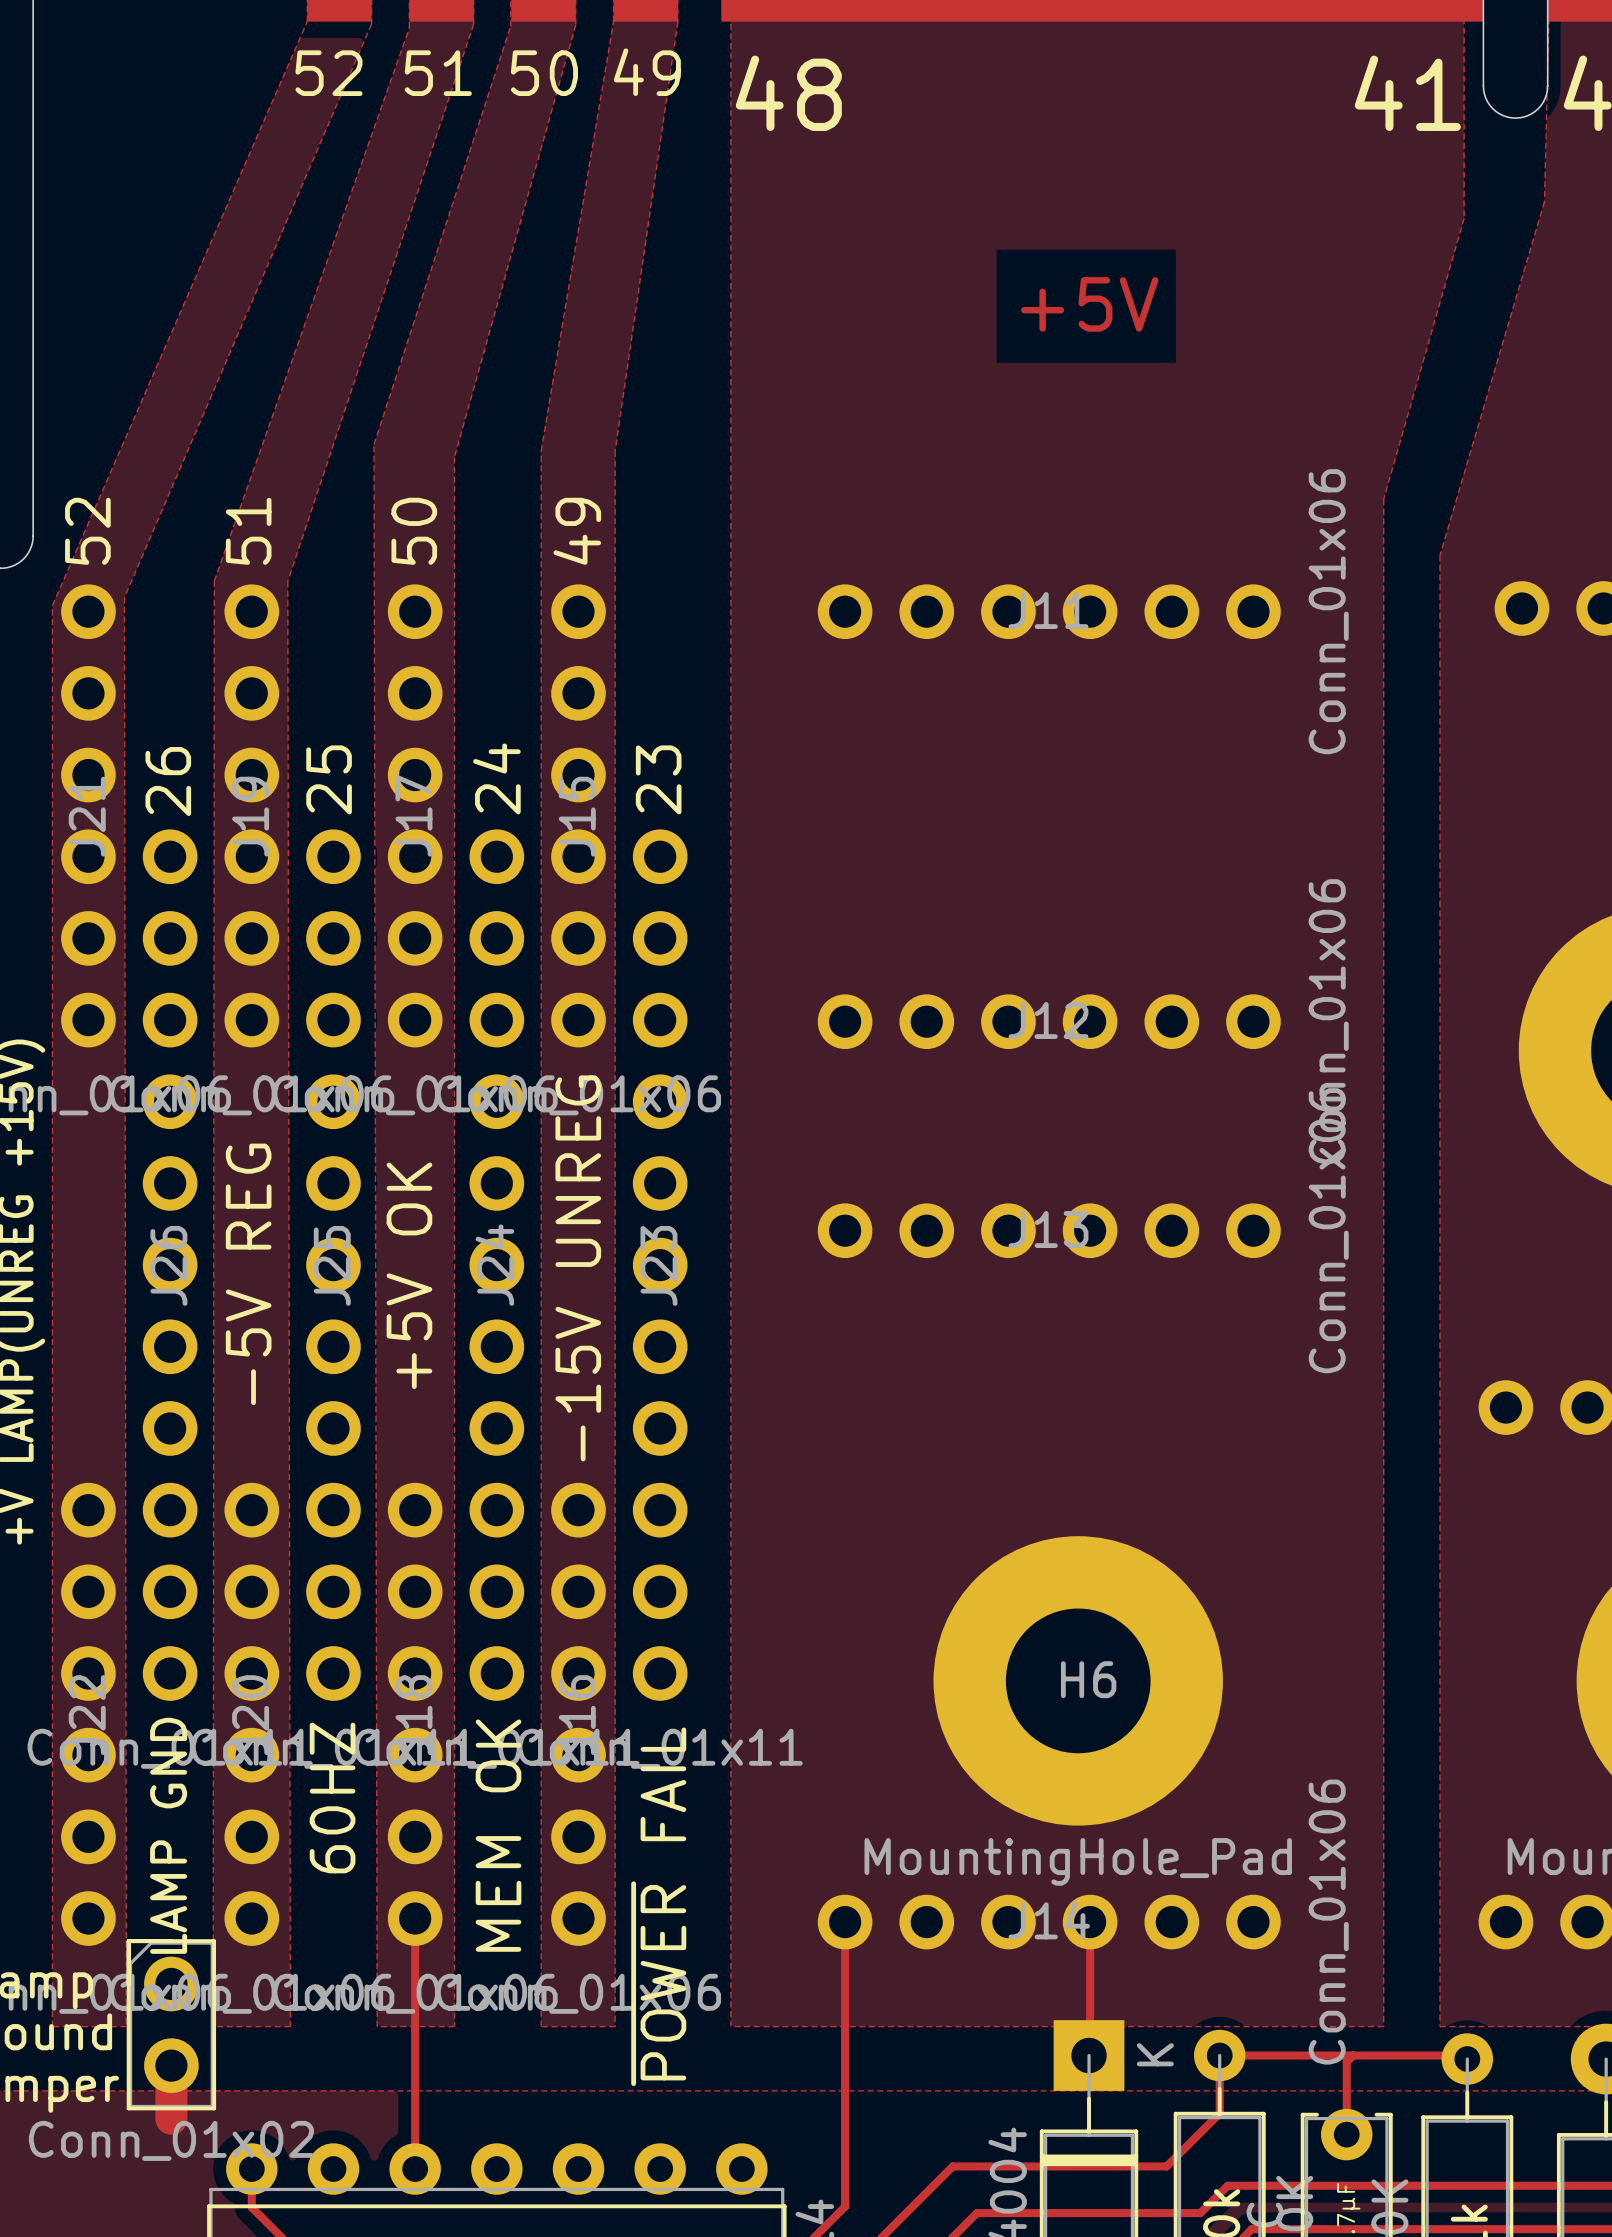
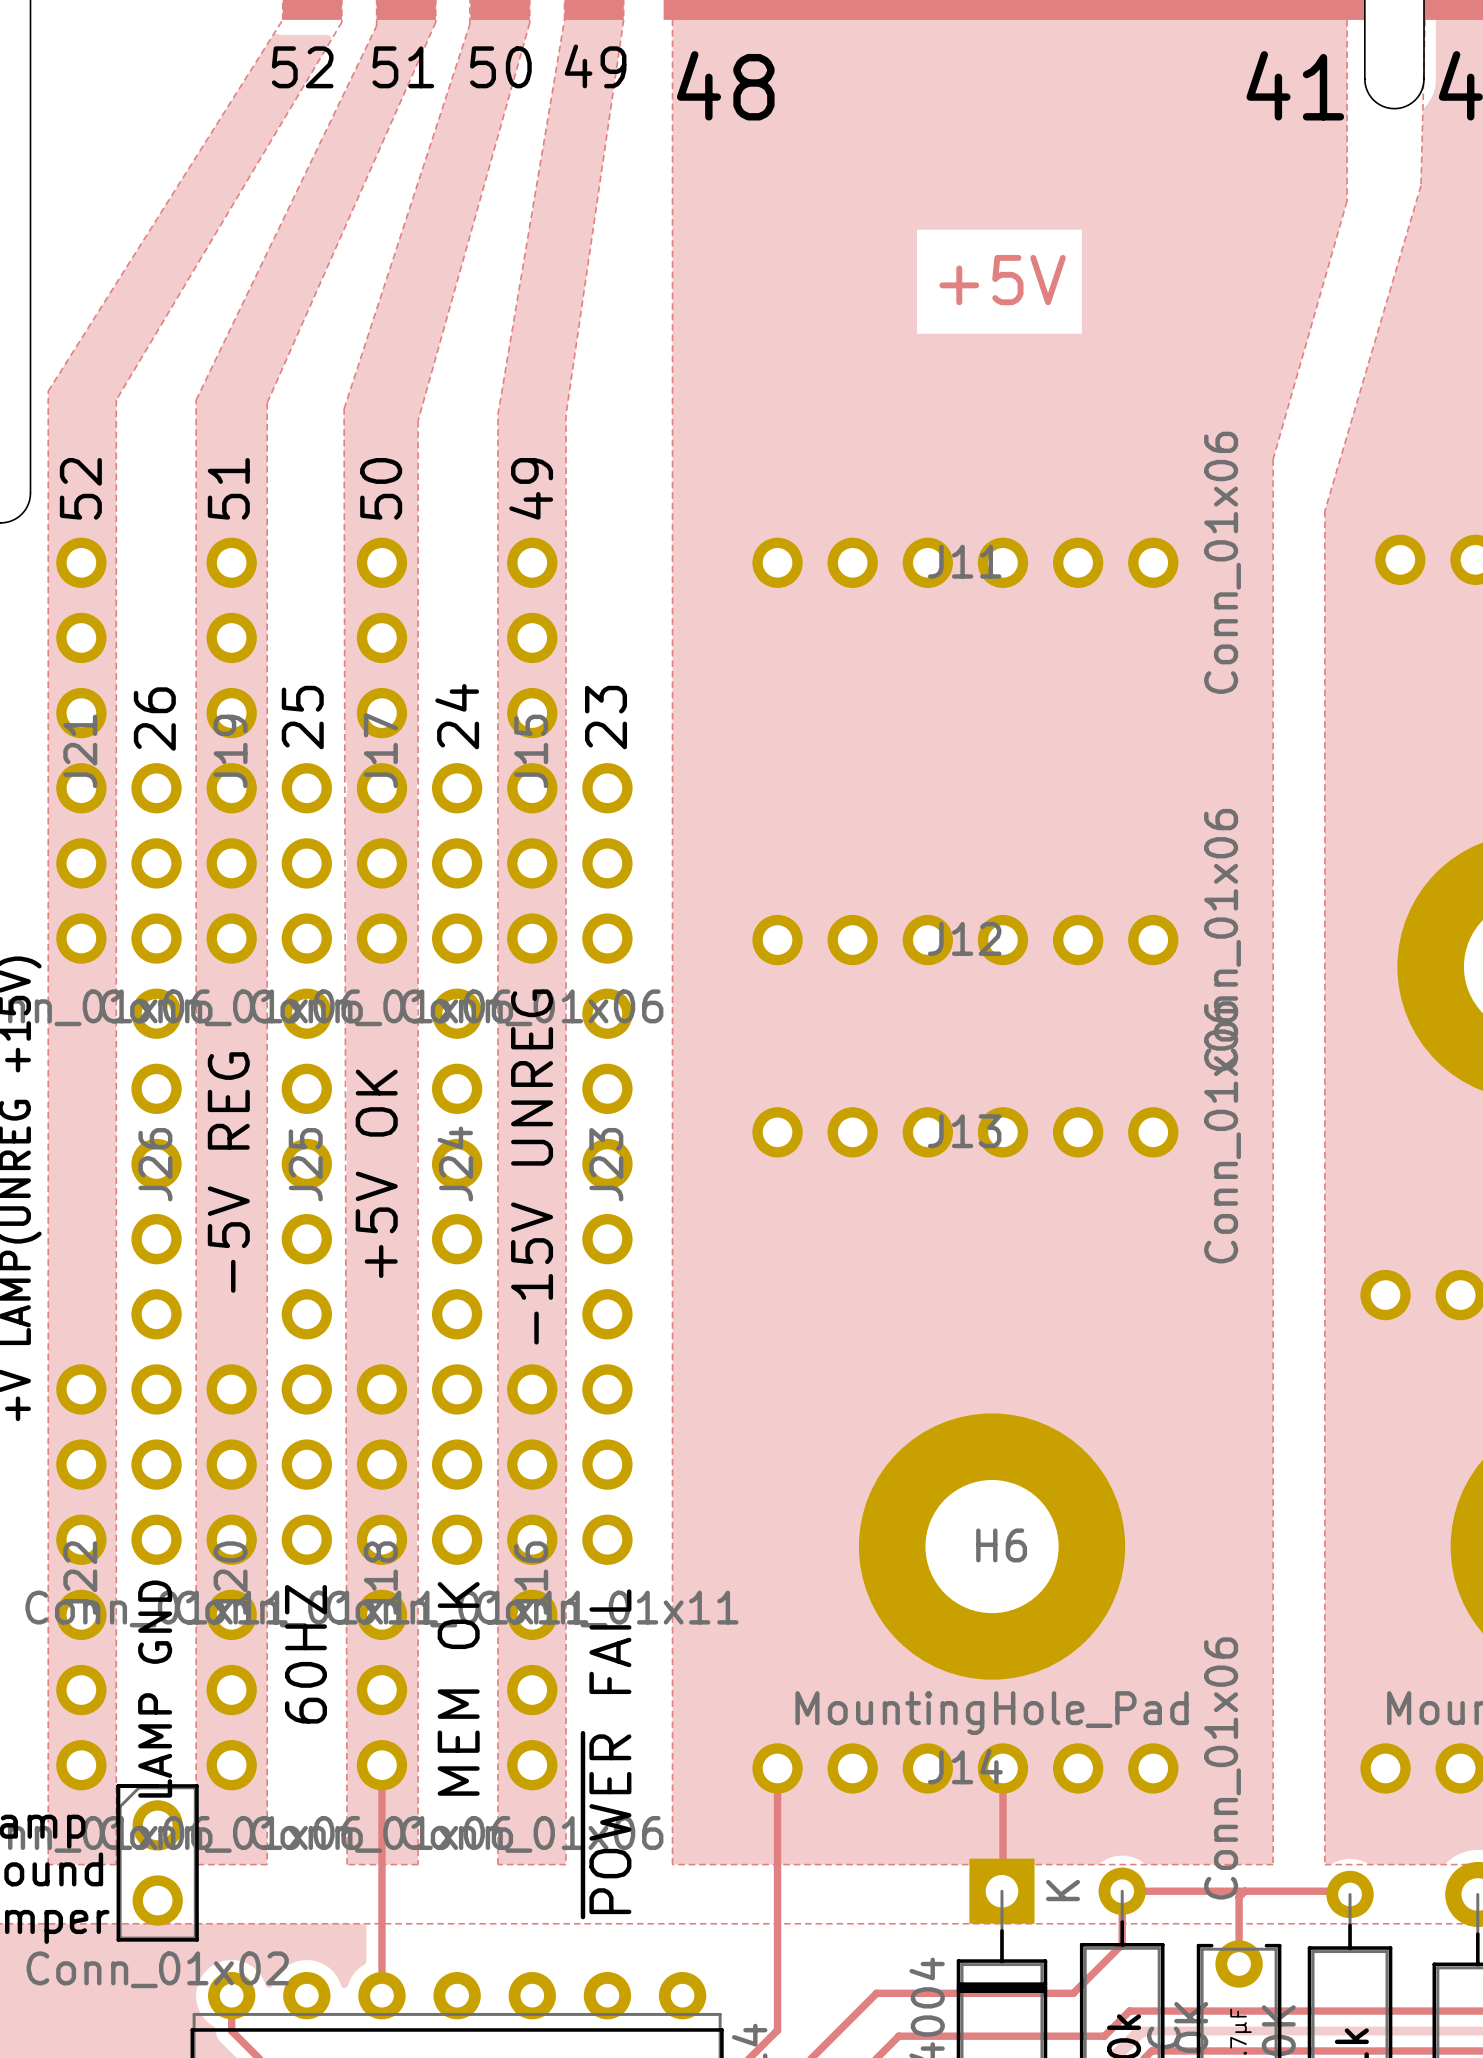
zone outline: (307, 21) (52, 605) -> (282, 19) (48, 391) (48, 557)
zone outline: (371, 24) (124, 597) (126, 2026) -> (341, 22) (116, 400) (116, 1864)
zone outline: (473, 24) (287, 581) (290, 2026) -> (435, 22) (267, 403) (267, 1864)
zone outline: (409, 28) (214, 581) (213, 2026) -> (376, 25) (196, 400) (196, 1864)
track: (171, 2065) (171, 2118) -> none

